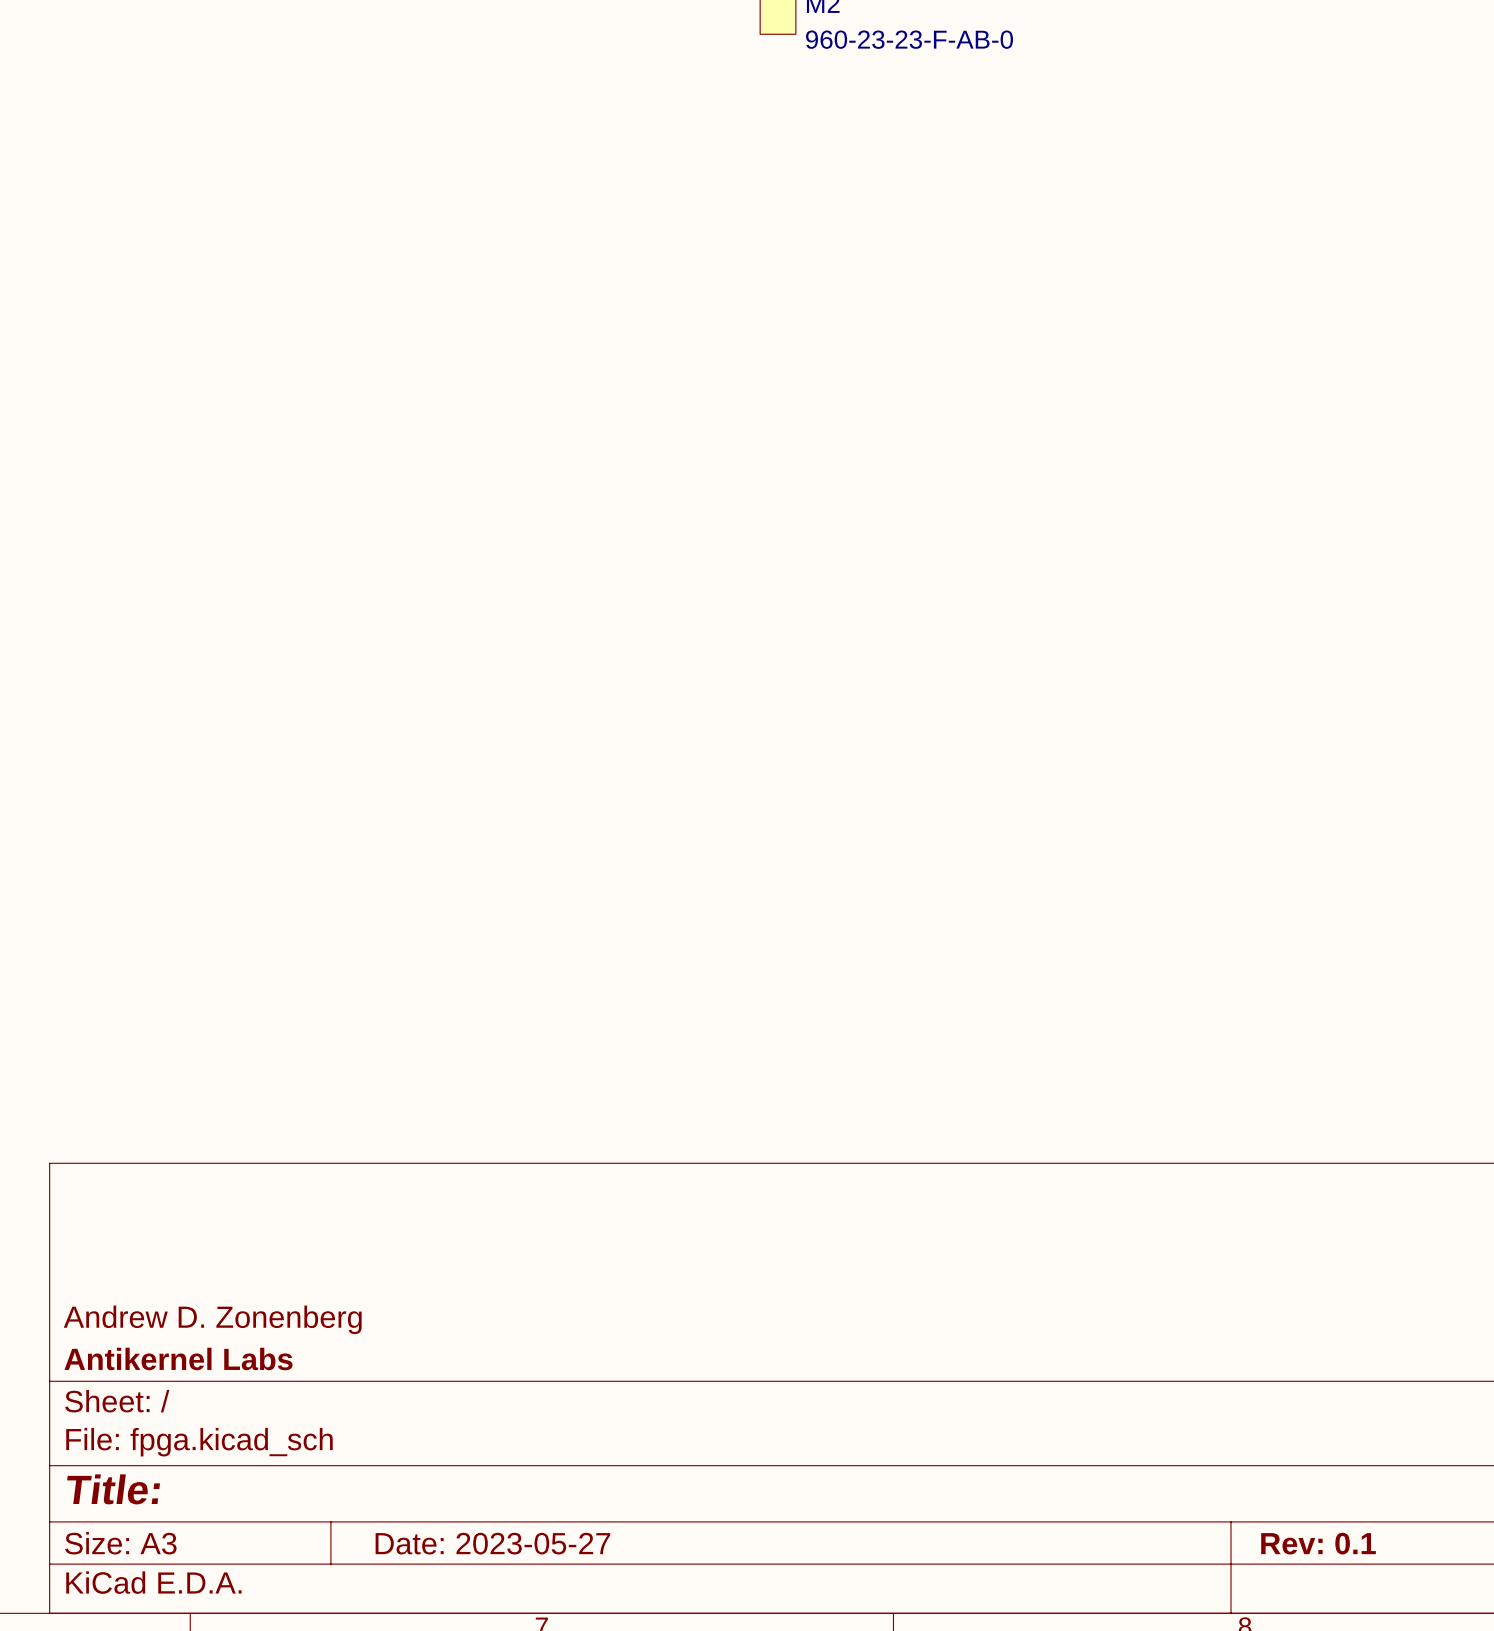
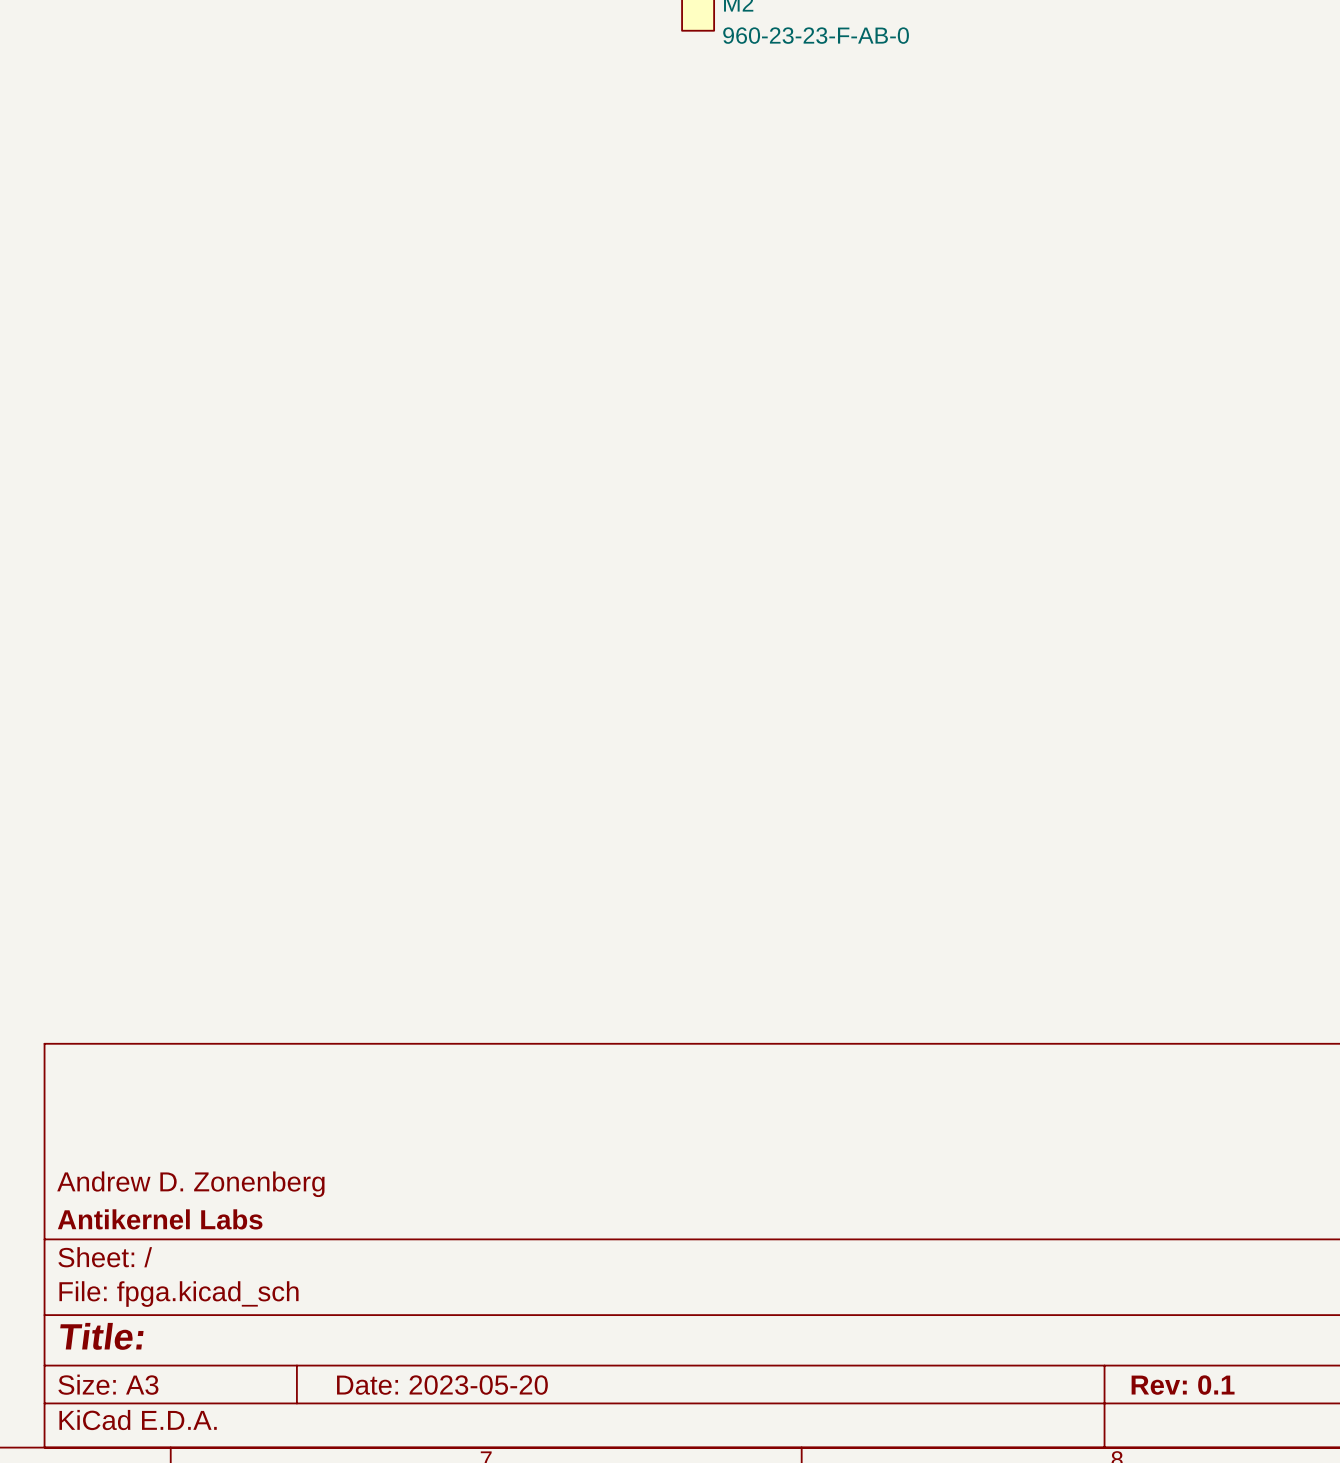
title block: Date: 2023-05-27 (492, 1543) -> Date: 2023-05-20 (442, 1385)

